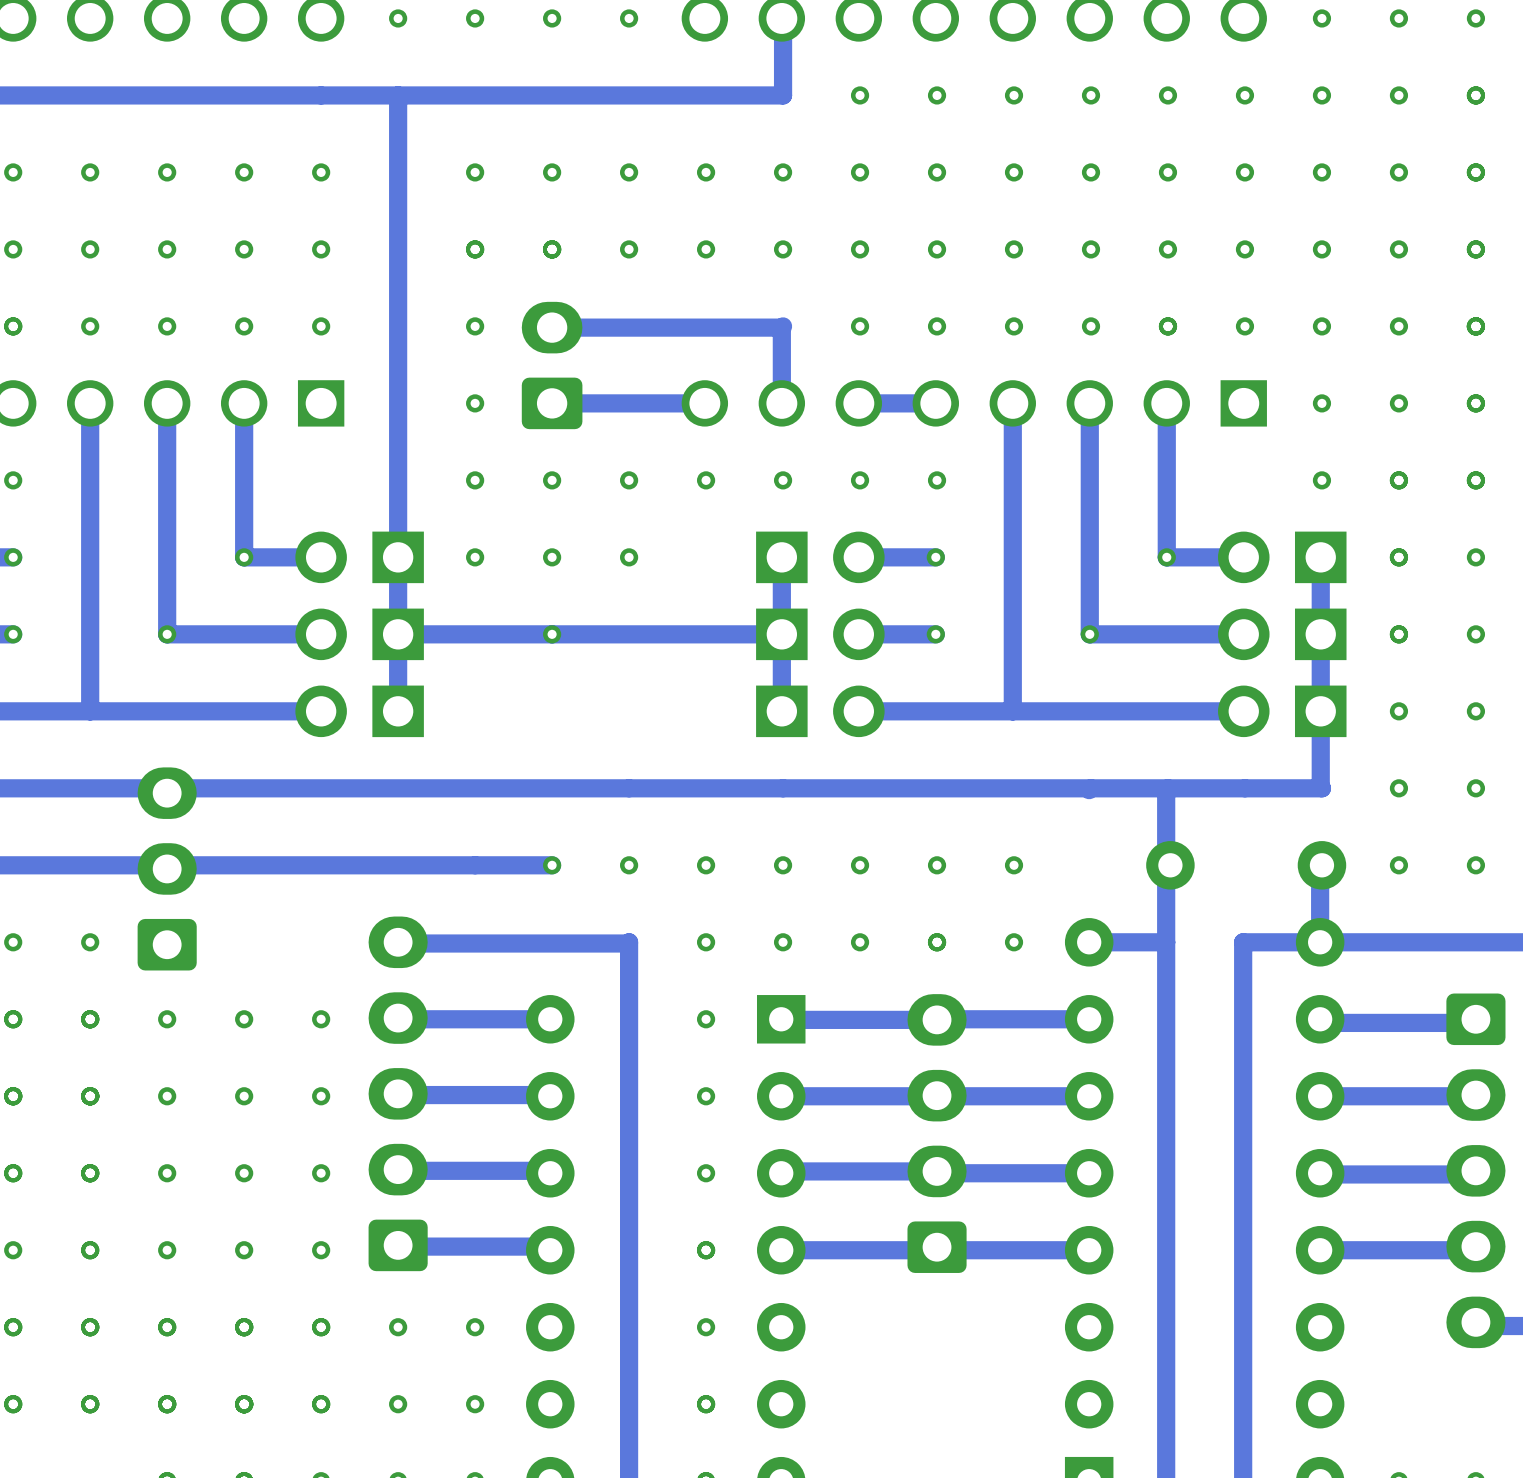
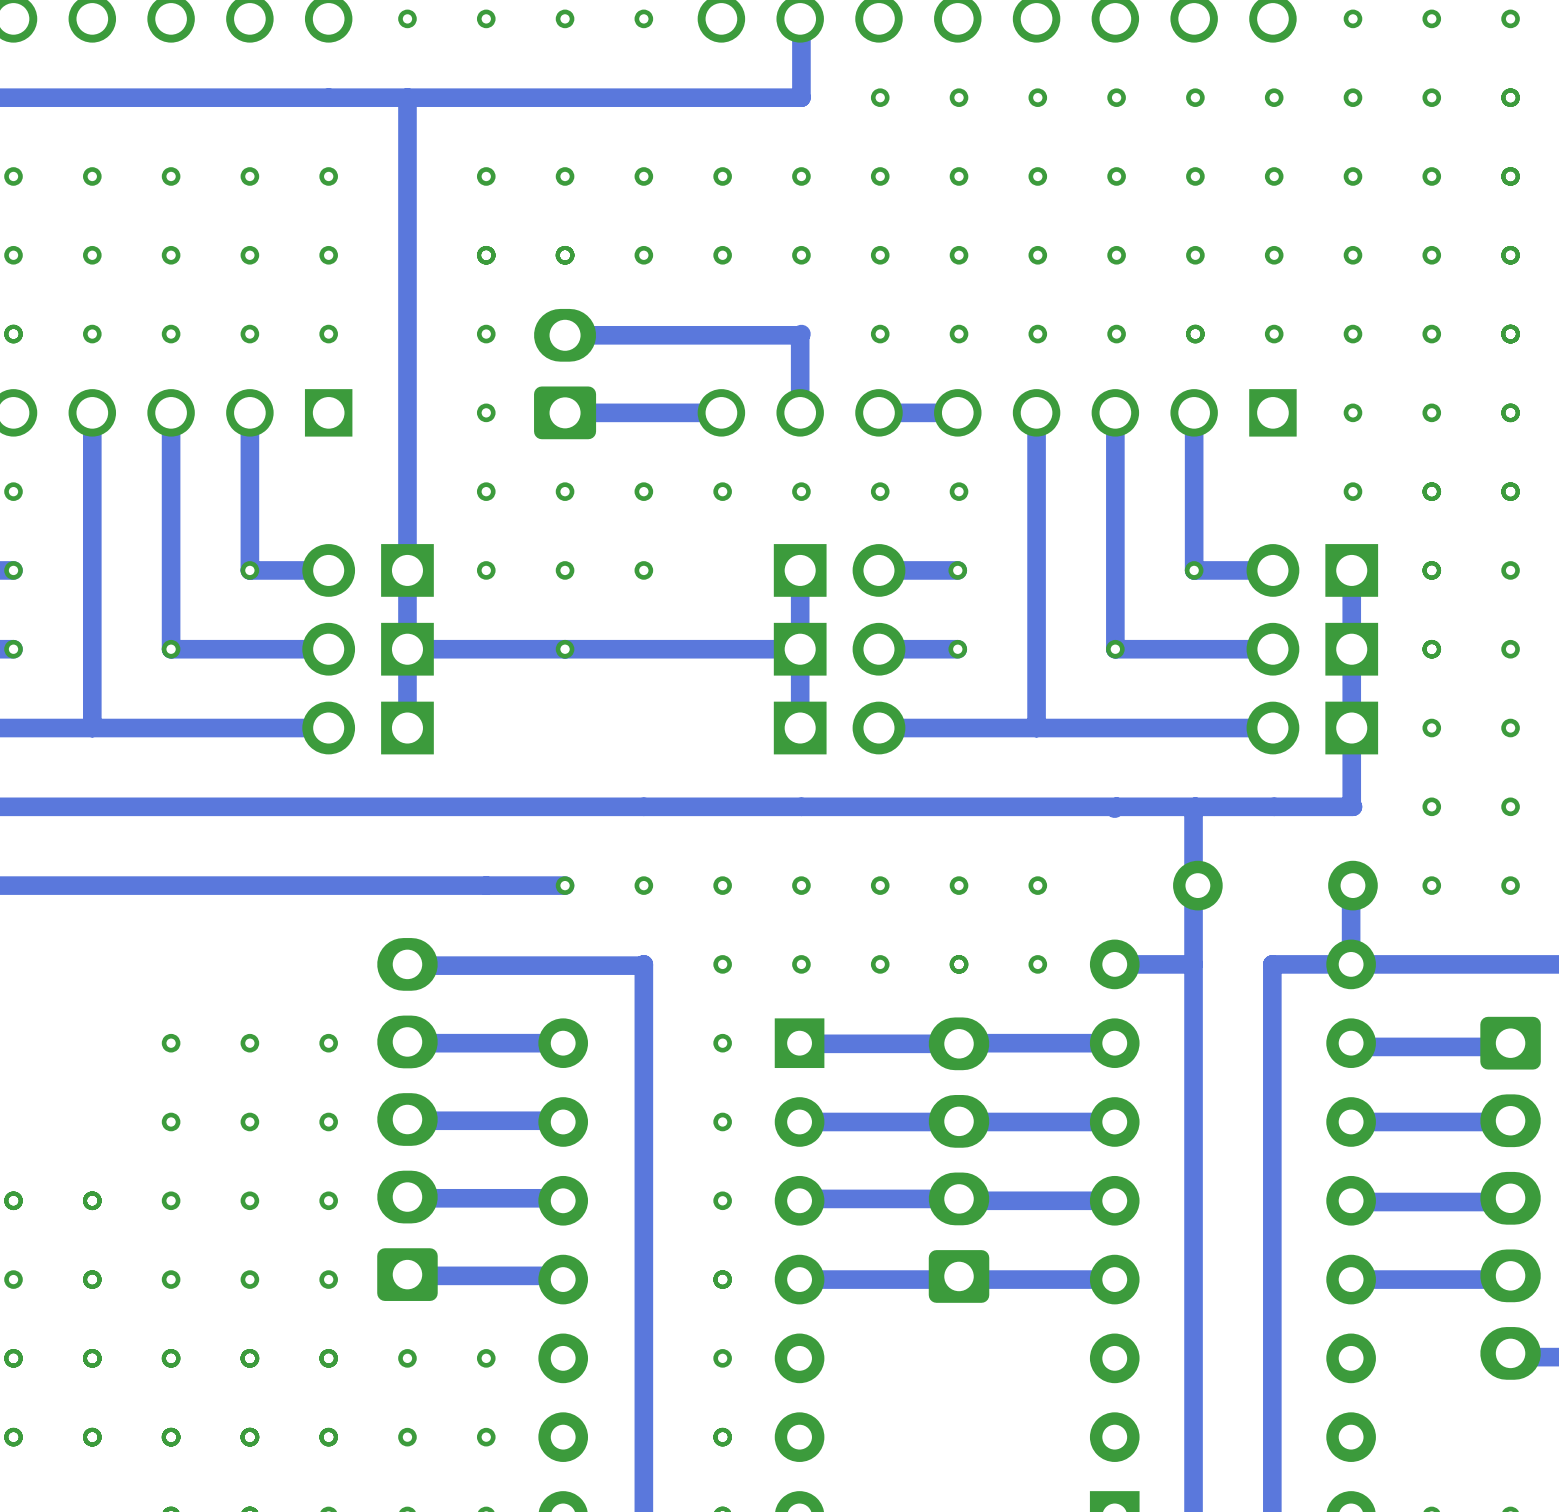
part: (167, 868) -> none
via: (13, 942) -> none
via: (90, 942) -> none
via: (13, 1019) -> none
via: (90, 1019) -> none
via: (13, 1096) -> none
via: (90, 1096) -> none

